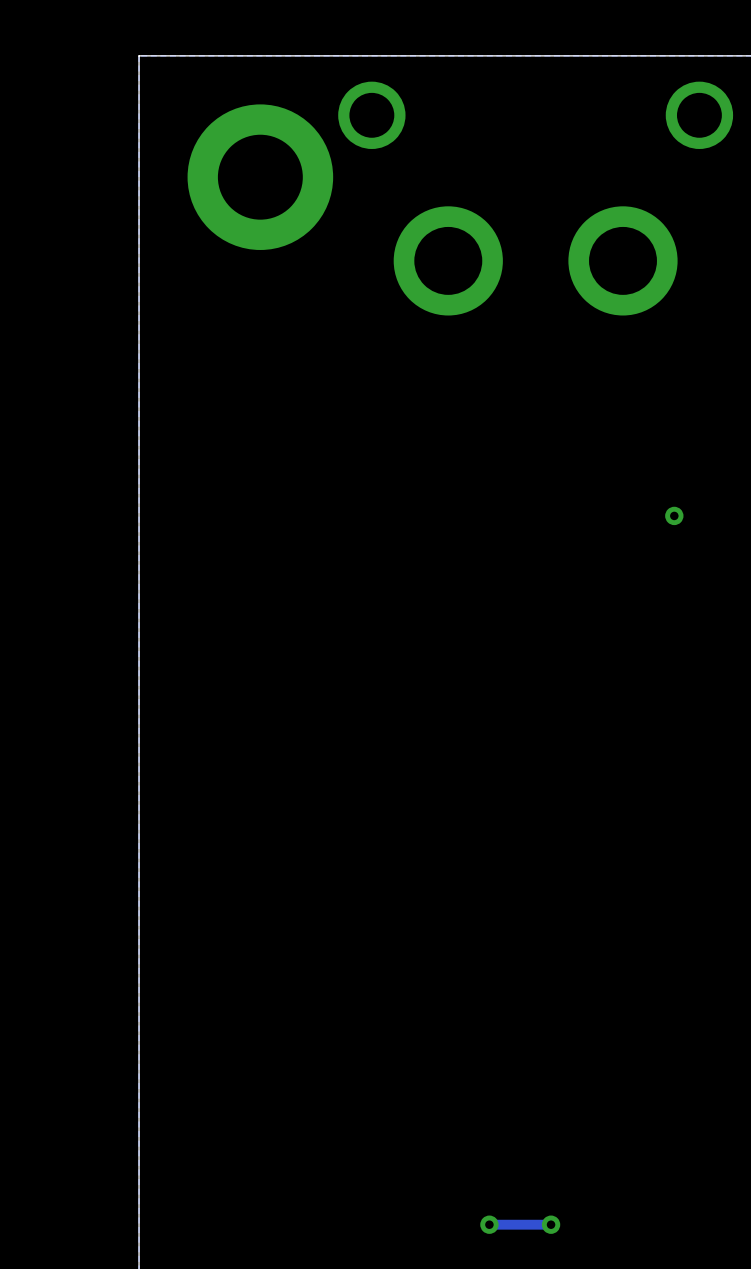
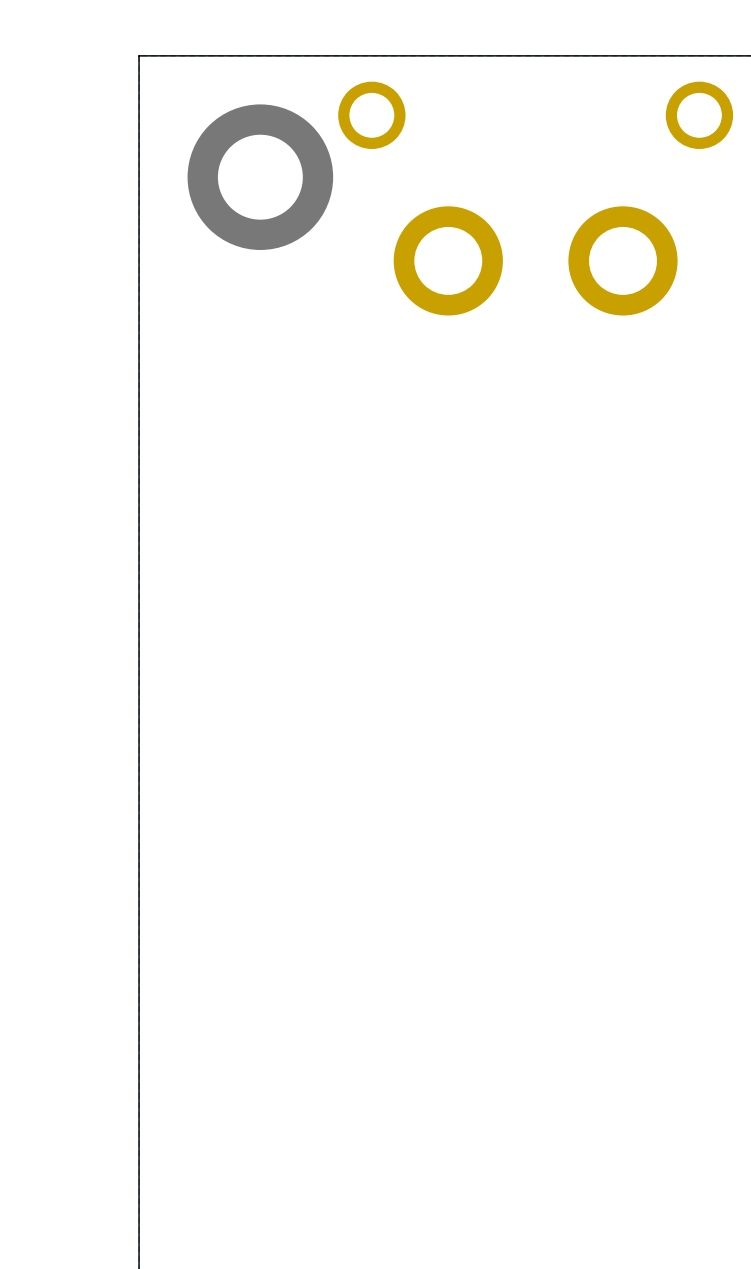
via: (674, 515) -> none
via: (489, 1224) -> none
track: (551, 1224) (489, 1224) -> none
via: (551, 1224) -> none

